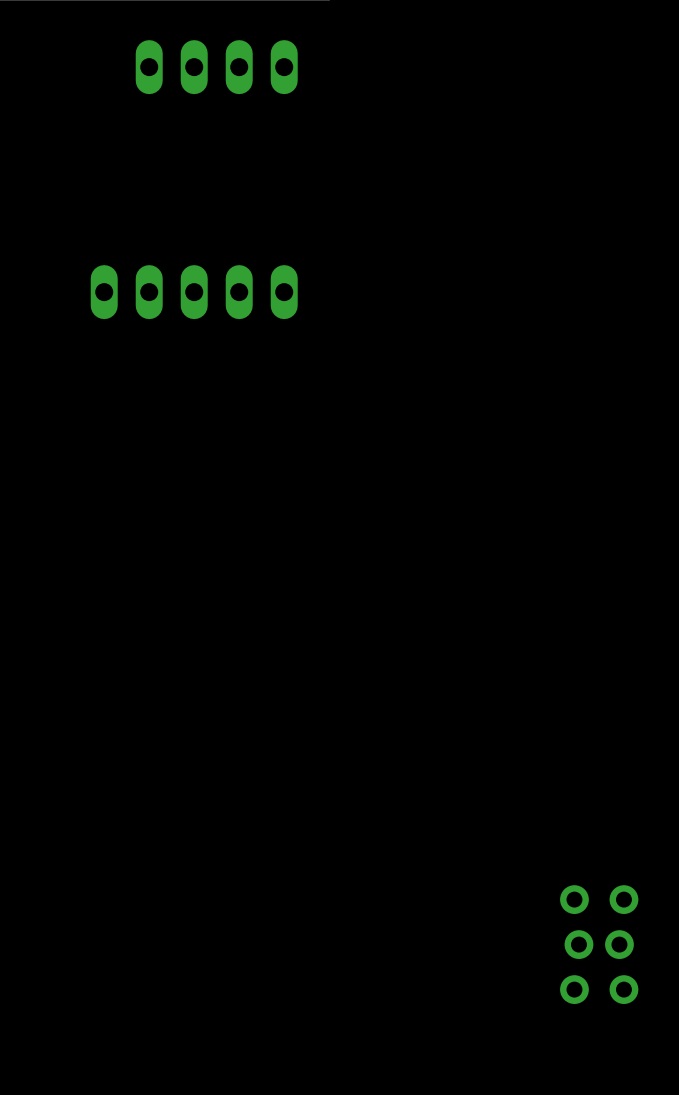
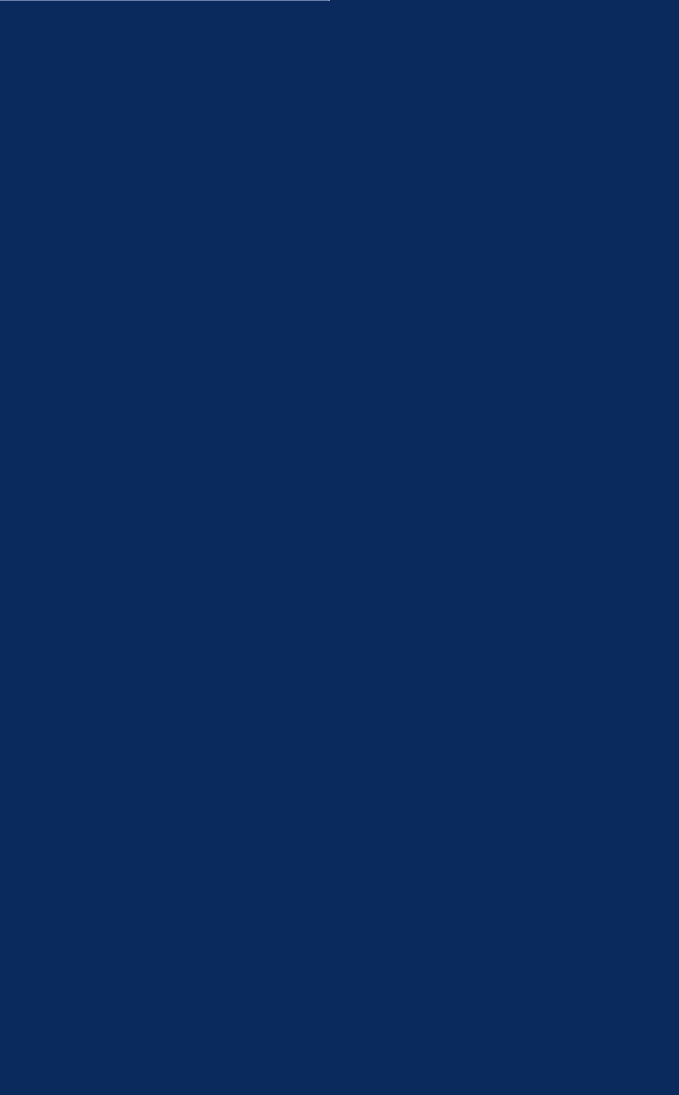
part: (216, 67) -> none
part: (194, 292) -> none
part: (599, 944) -> none

